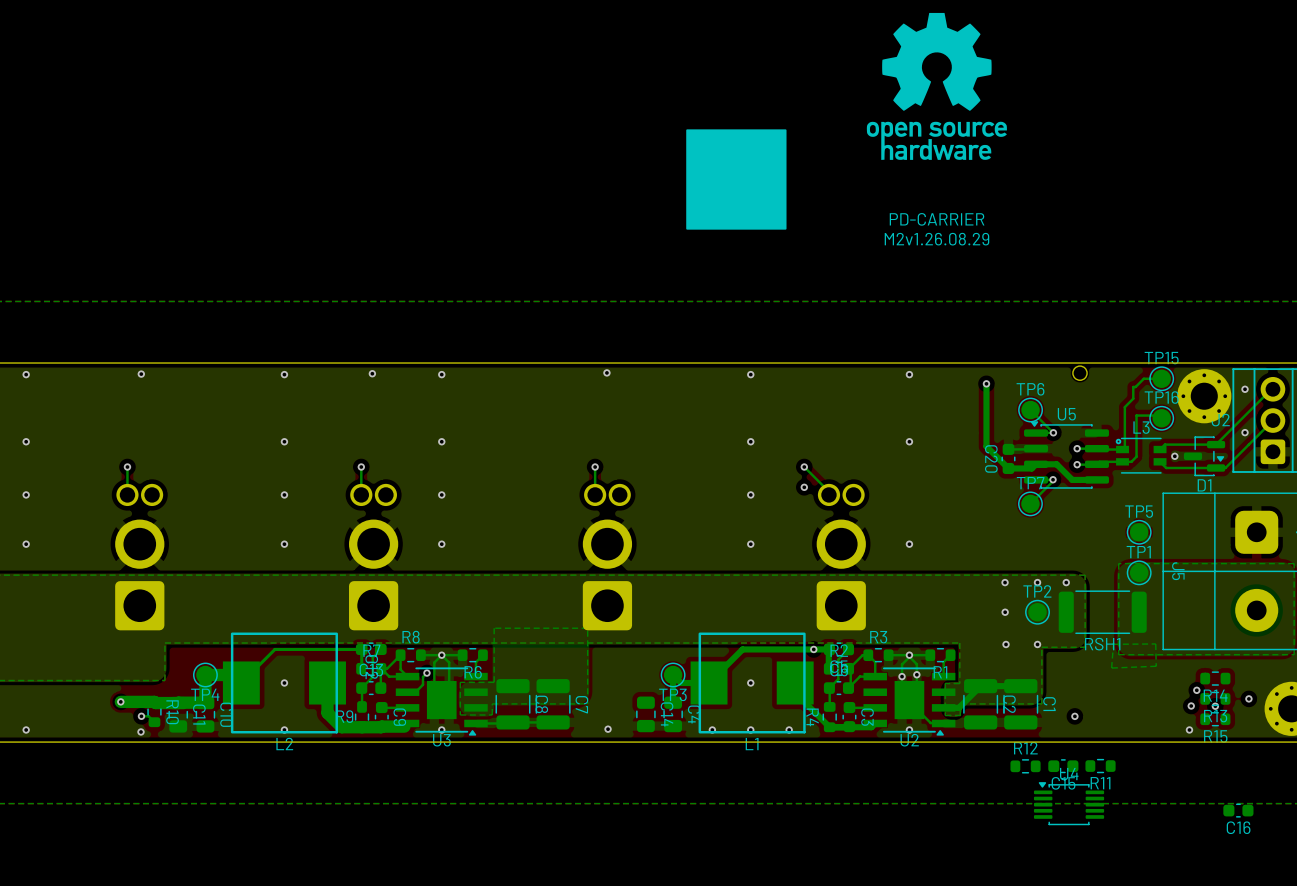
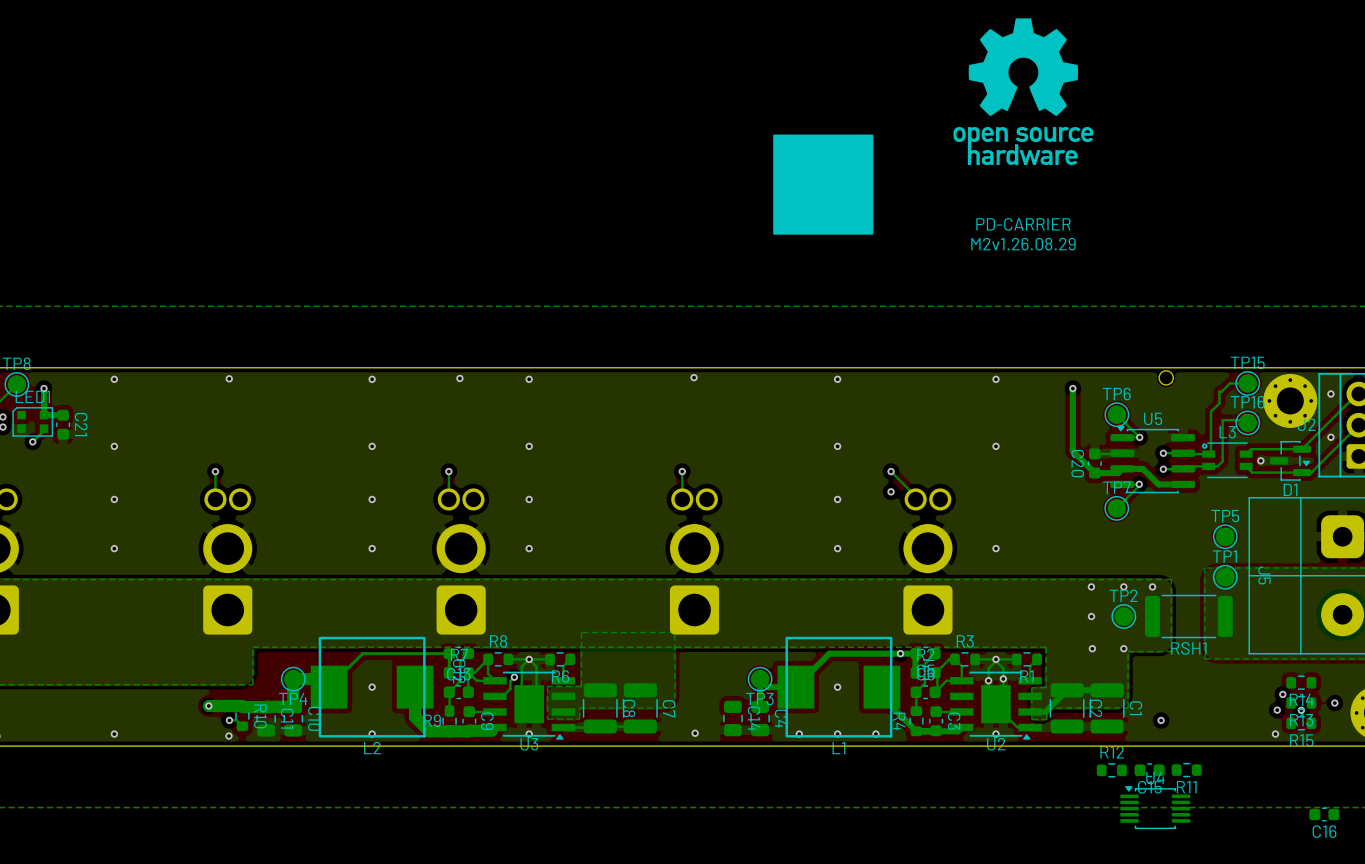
bottom zone outline: (1113, 642) (1111, 668) (1156, 666) (1155, 643) (1113, 644) (1113, 642) -> none

